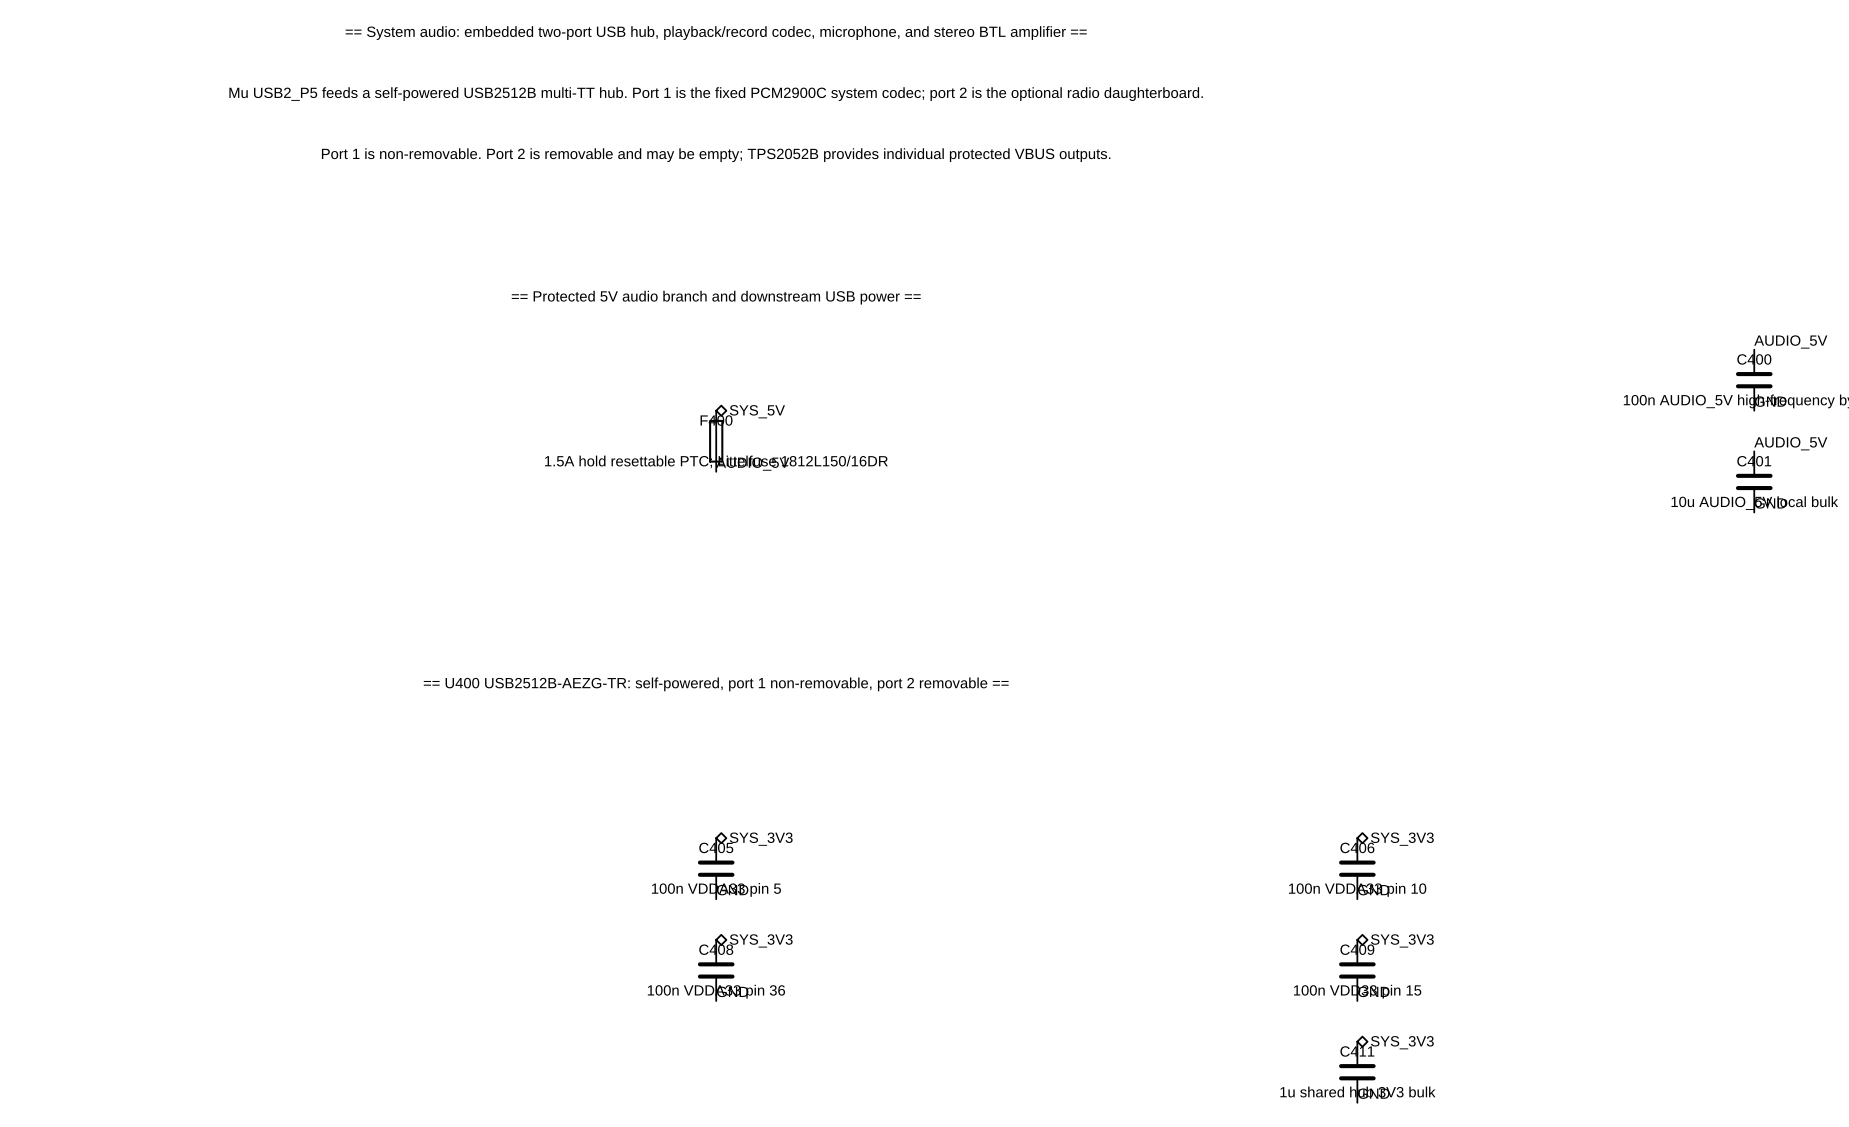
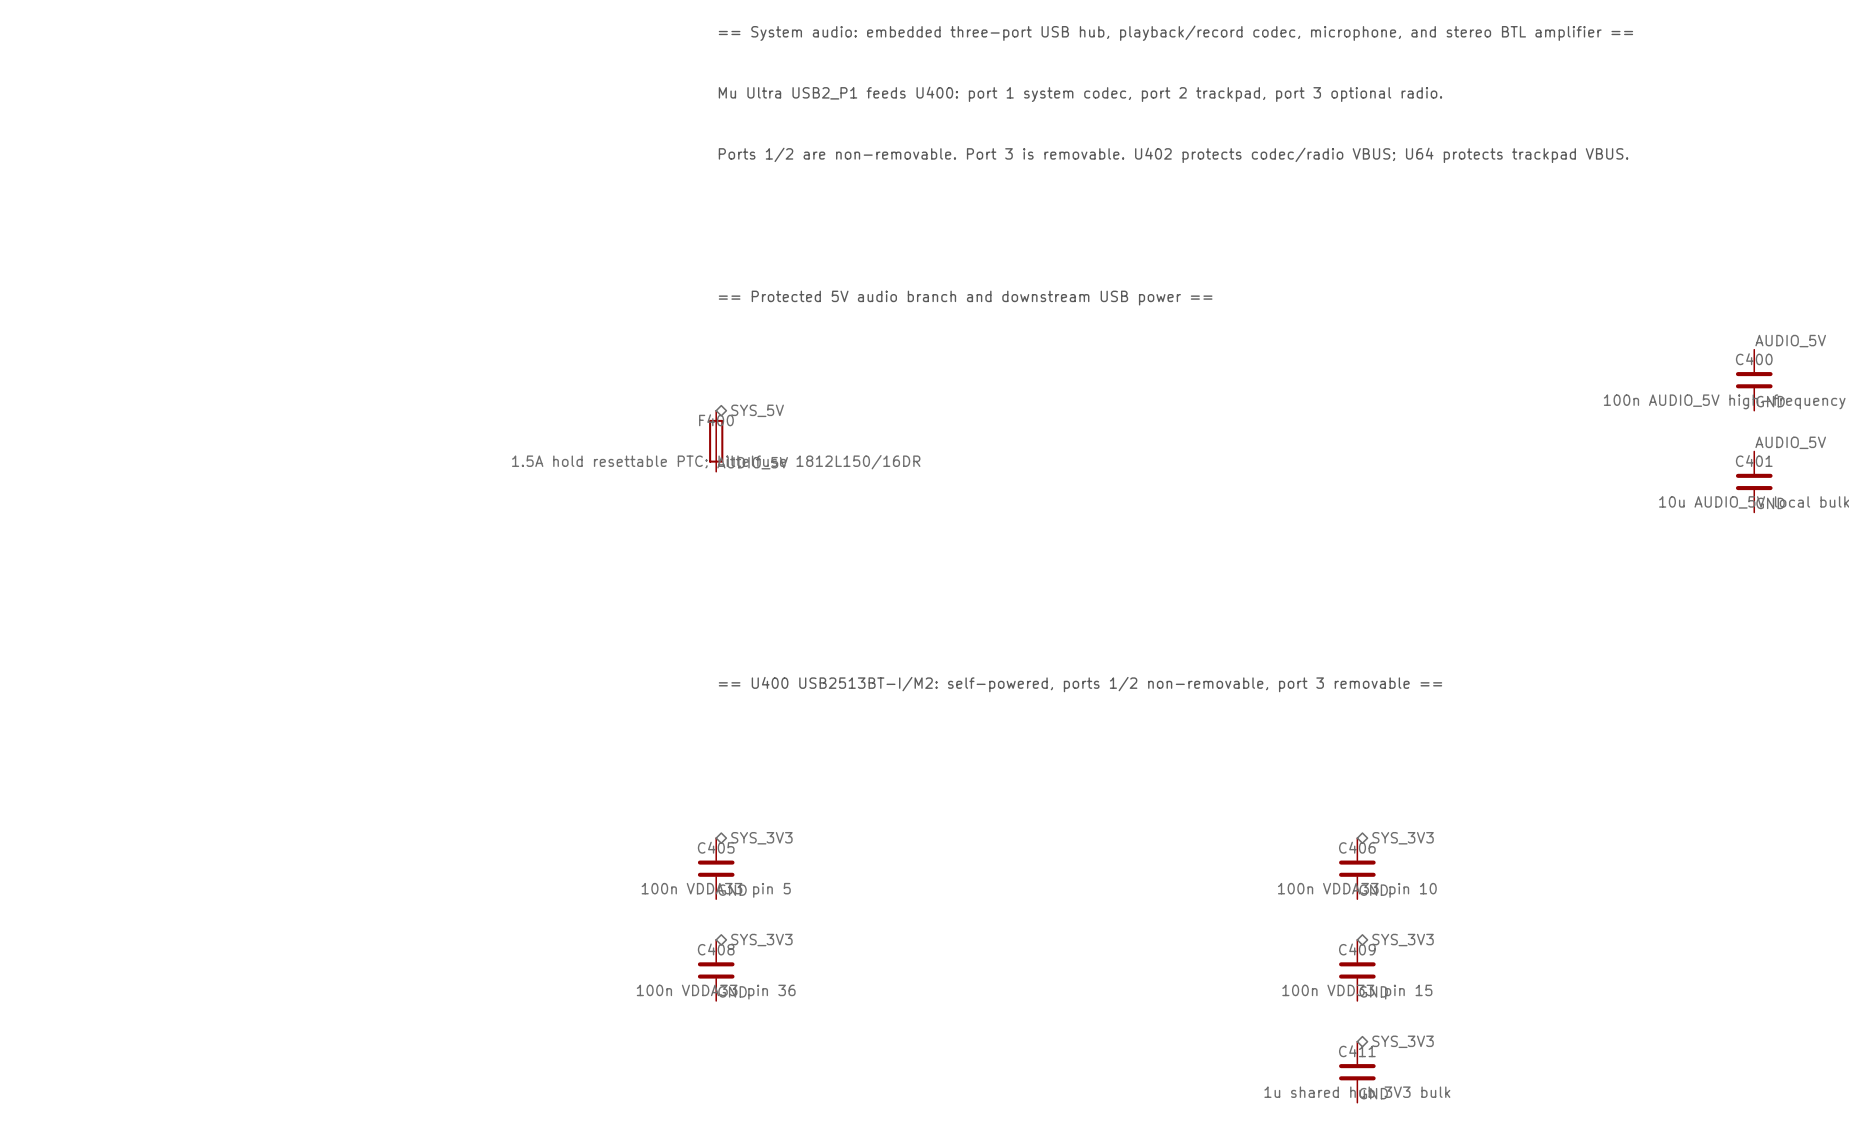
text: == System audio: embedded two-port USB hub, playback/record codec, microphone, and stereo BTL amplifier == (716, 33) -> == System audio: embedded three-port USB hub, playback/record codec, microphone, and stereo BTL amplifier == (1175, 33)
text: Mu USB2_P5 feeds a self-powered USB2512B multi-TT hub. Port 1 is the fixed PCM2900C system codec; port 2 is the optional radio daughterboard. (716, 94) -> Mu Ultra USB2_P1 feeds U400: port 1 system codec, port 2 trackpad, port 3 optional radio. (1080, 94)
text: Port 1 is non-removable. Port 2 is removable and may be empty; TPS2052B provides individual protected VBUS outputs. (716, 155) -> Ports 1/2 are non-removable. Port 3 is removable. U402 protects codec/radio VBUS; U64 protects trackpad VBUS. (1173, 155)
text position: == Protected 5V audio branch and downstream USB power == (716, 297) -> == Protected 5V audio branch and downstream USB power == (965, 298)
text: == U400 USB2512B-AEZG-TR: self-powered, port 1 non-removable, port 2 removable == (716, 684) -> == U400 USB2513BT-I/M2: self-powered, ports 1/2 non-removable, port 3 removable == (1080, 684)

